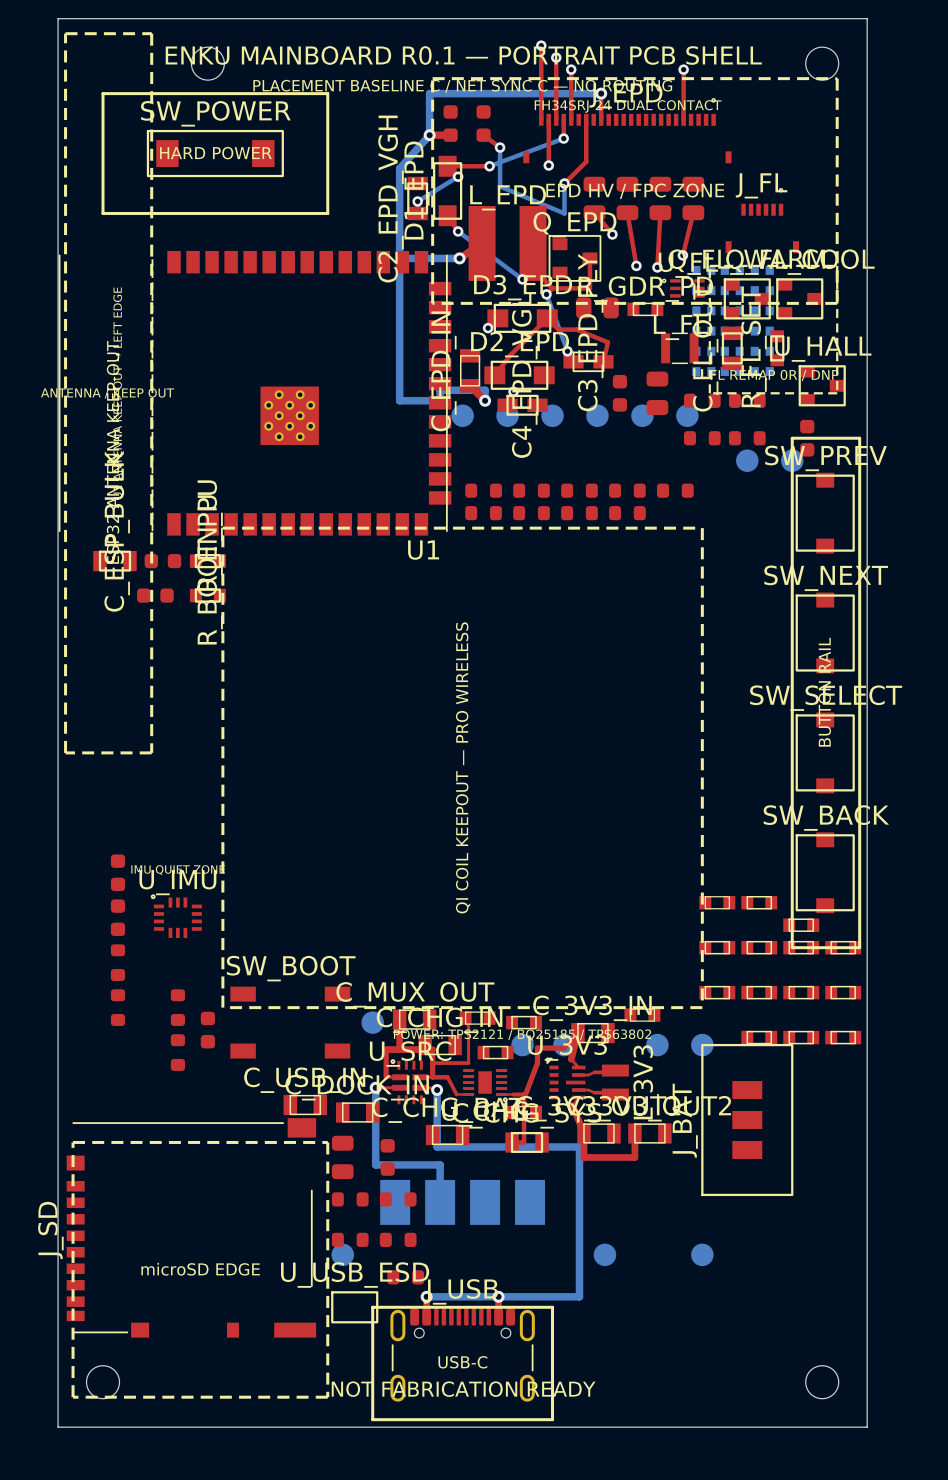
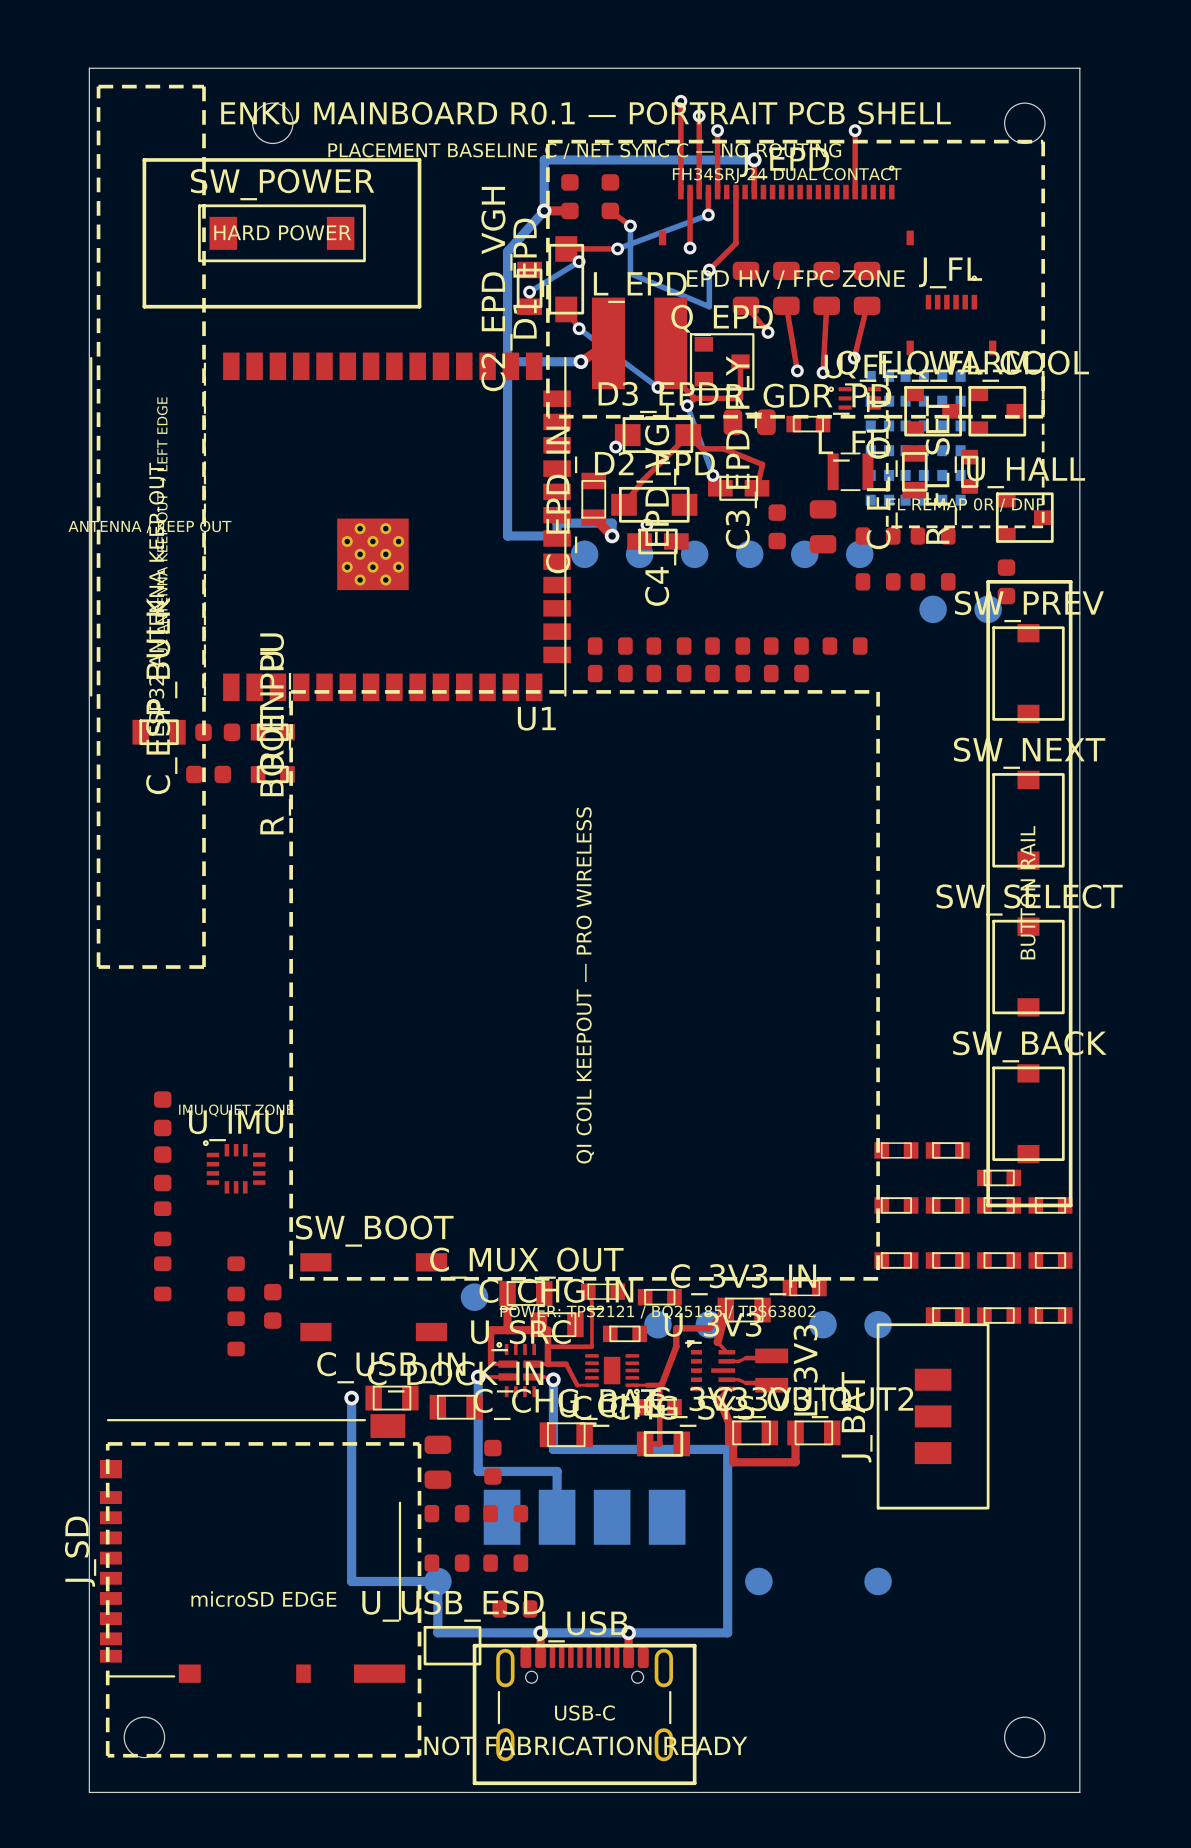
bottom track: none -> (351, 1398) (351, 1581) (437, 1581) (437, 1632) (540, 1632)
via: none -> (351, 1398)

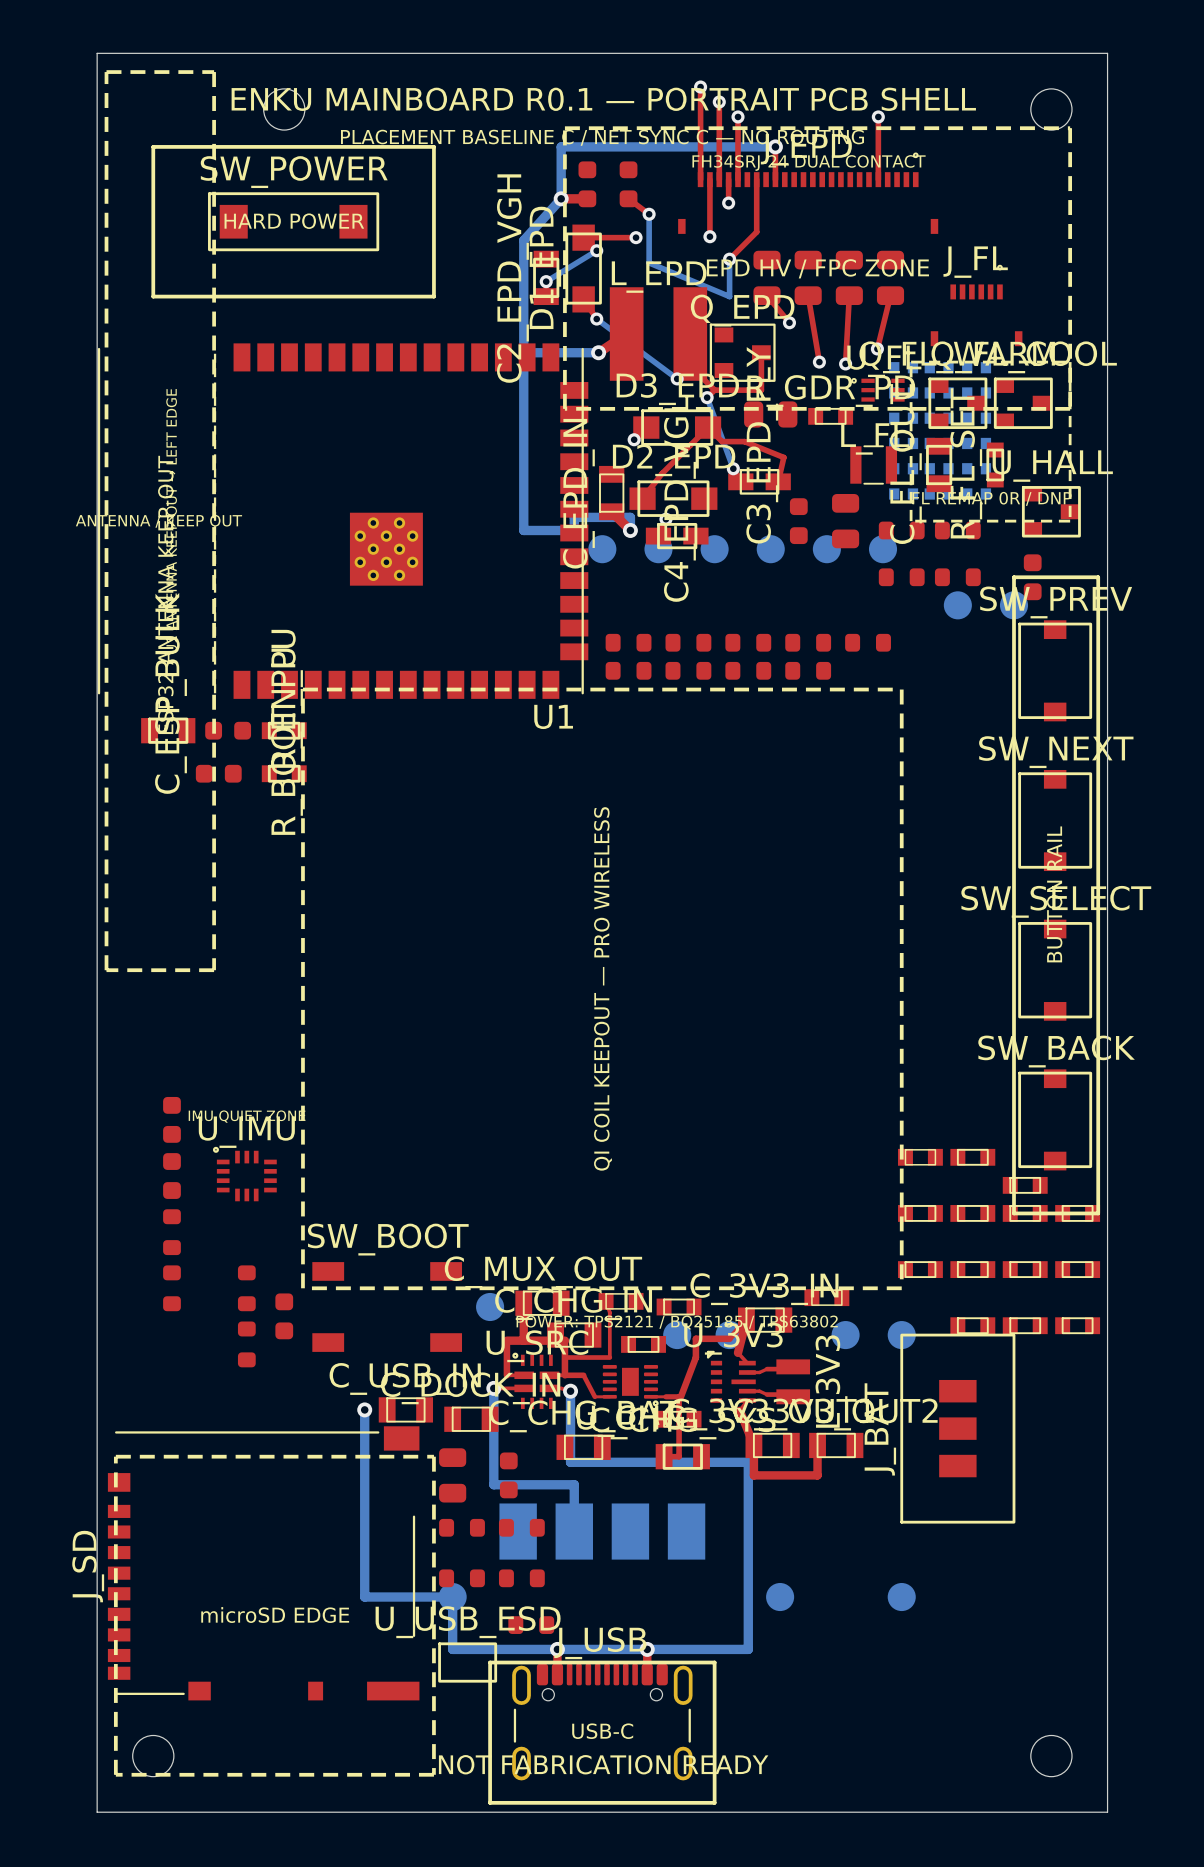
bottom track: (708, 215) (617, 248) -> none

